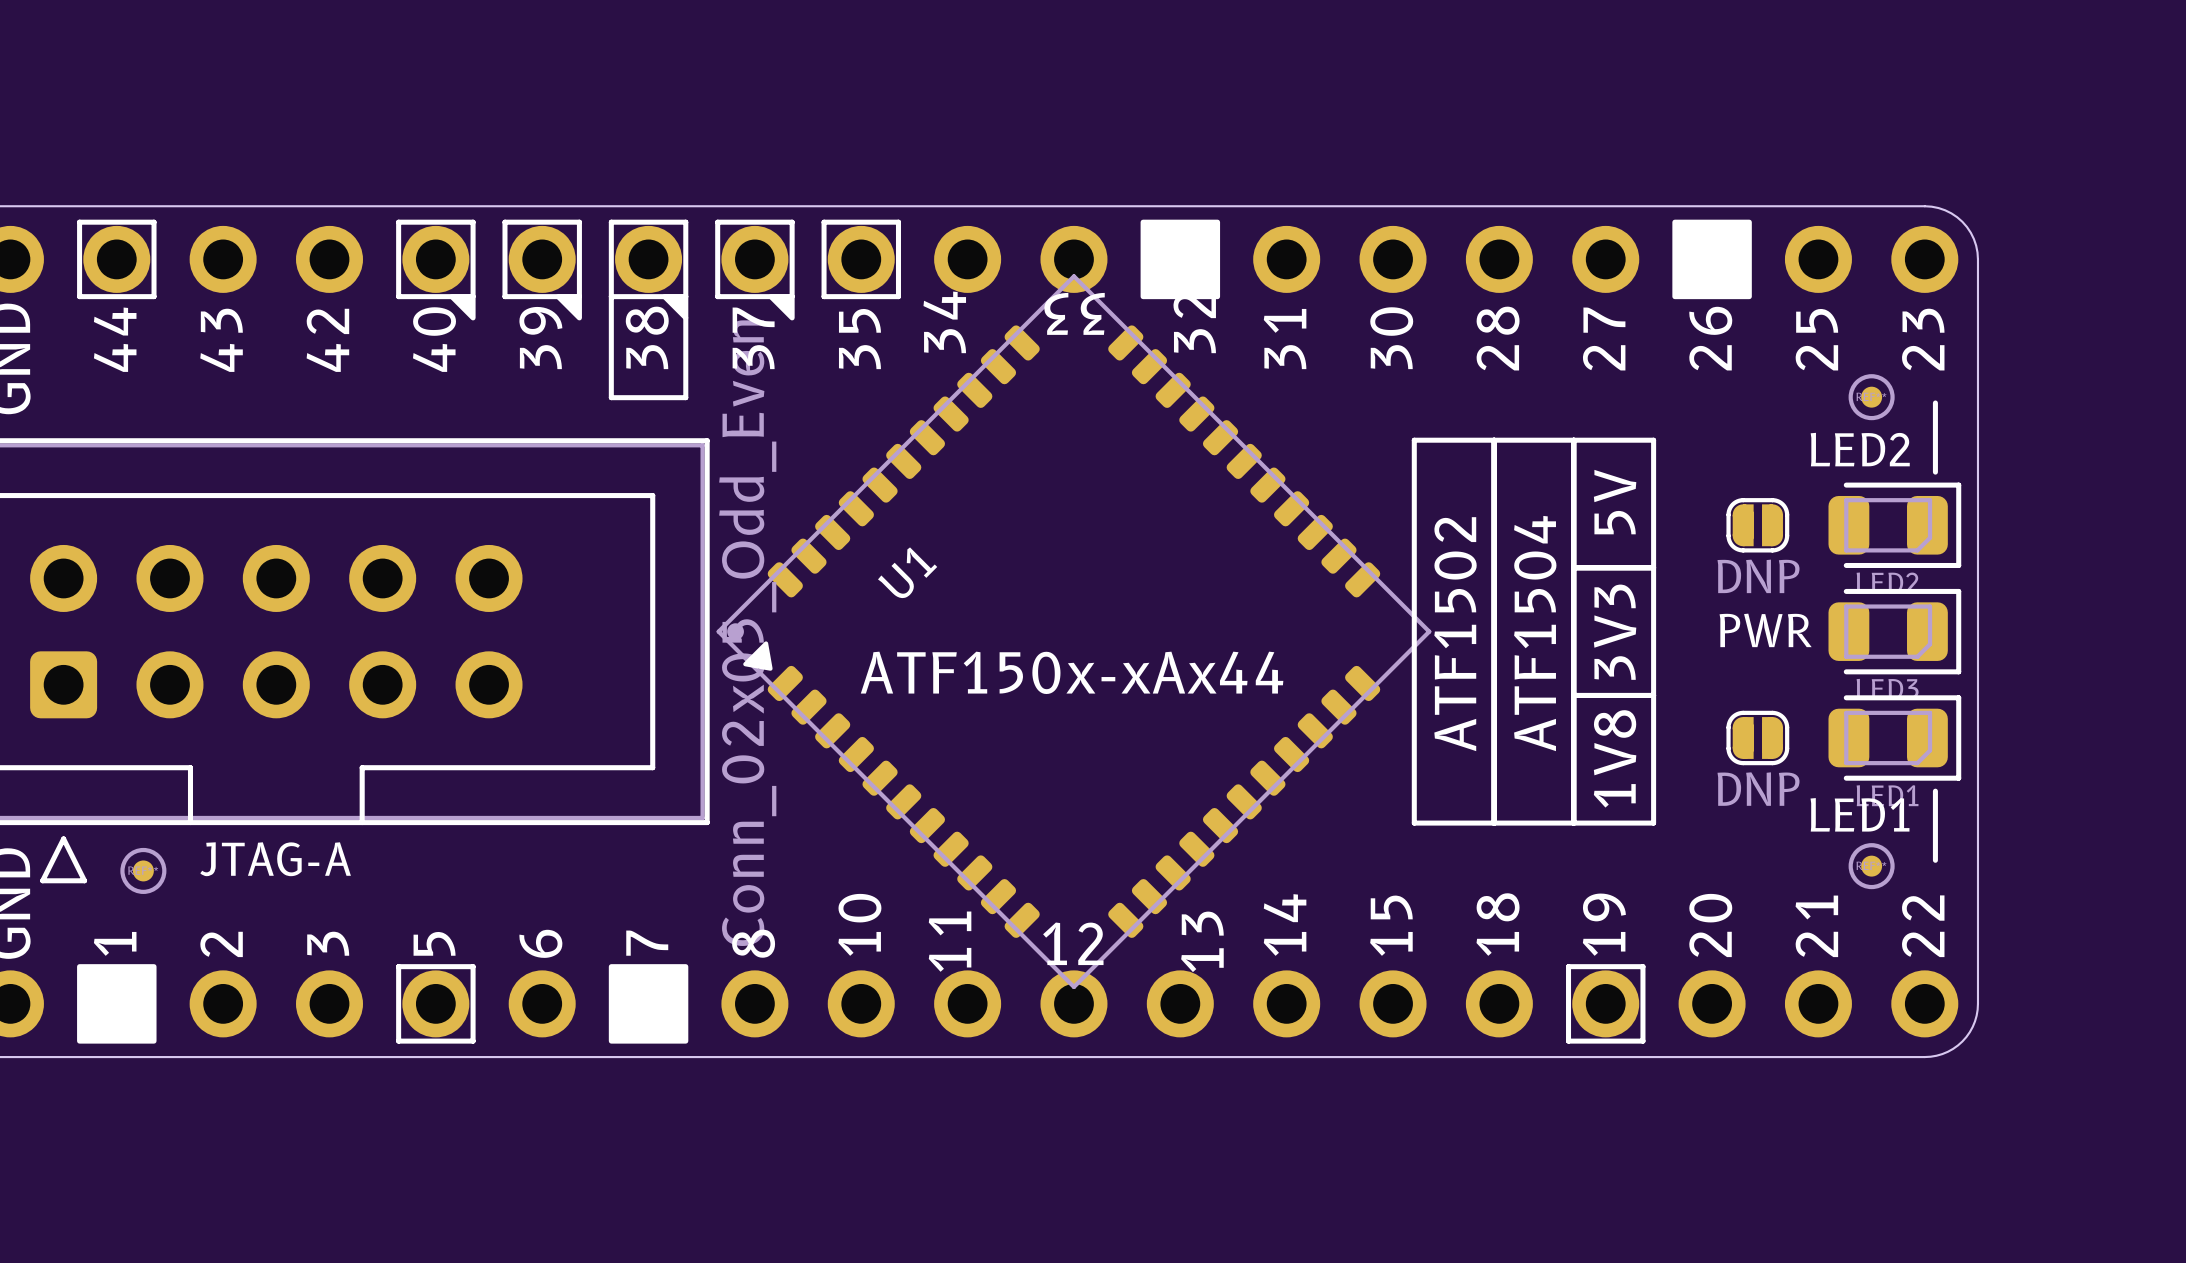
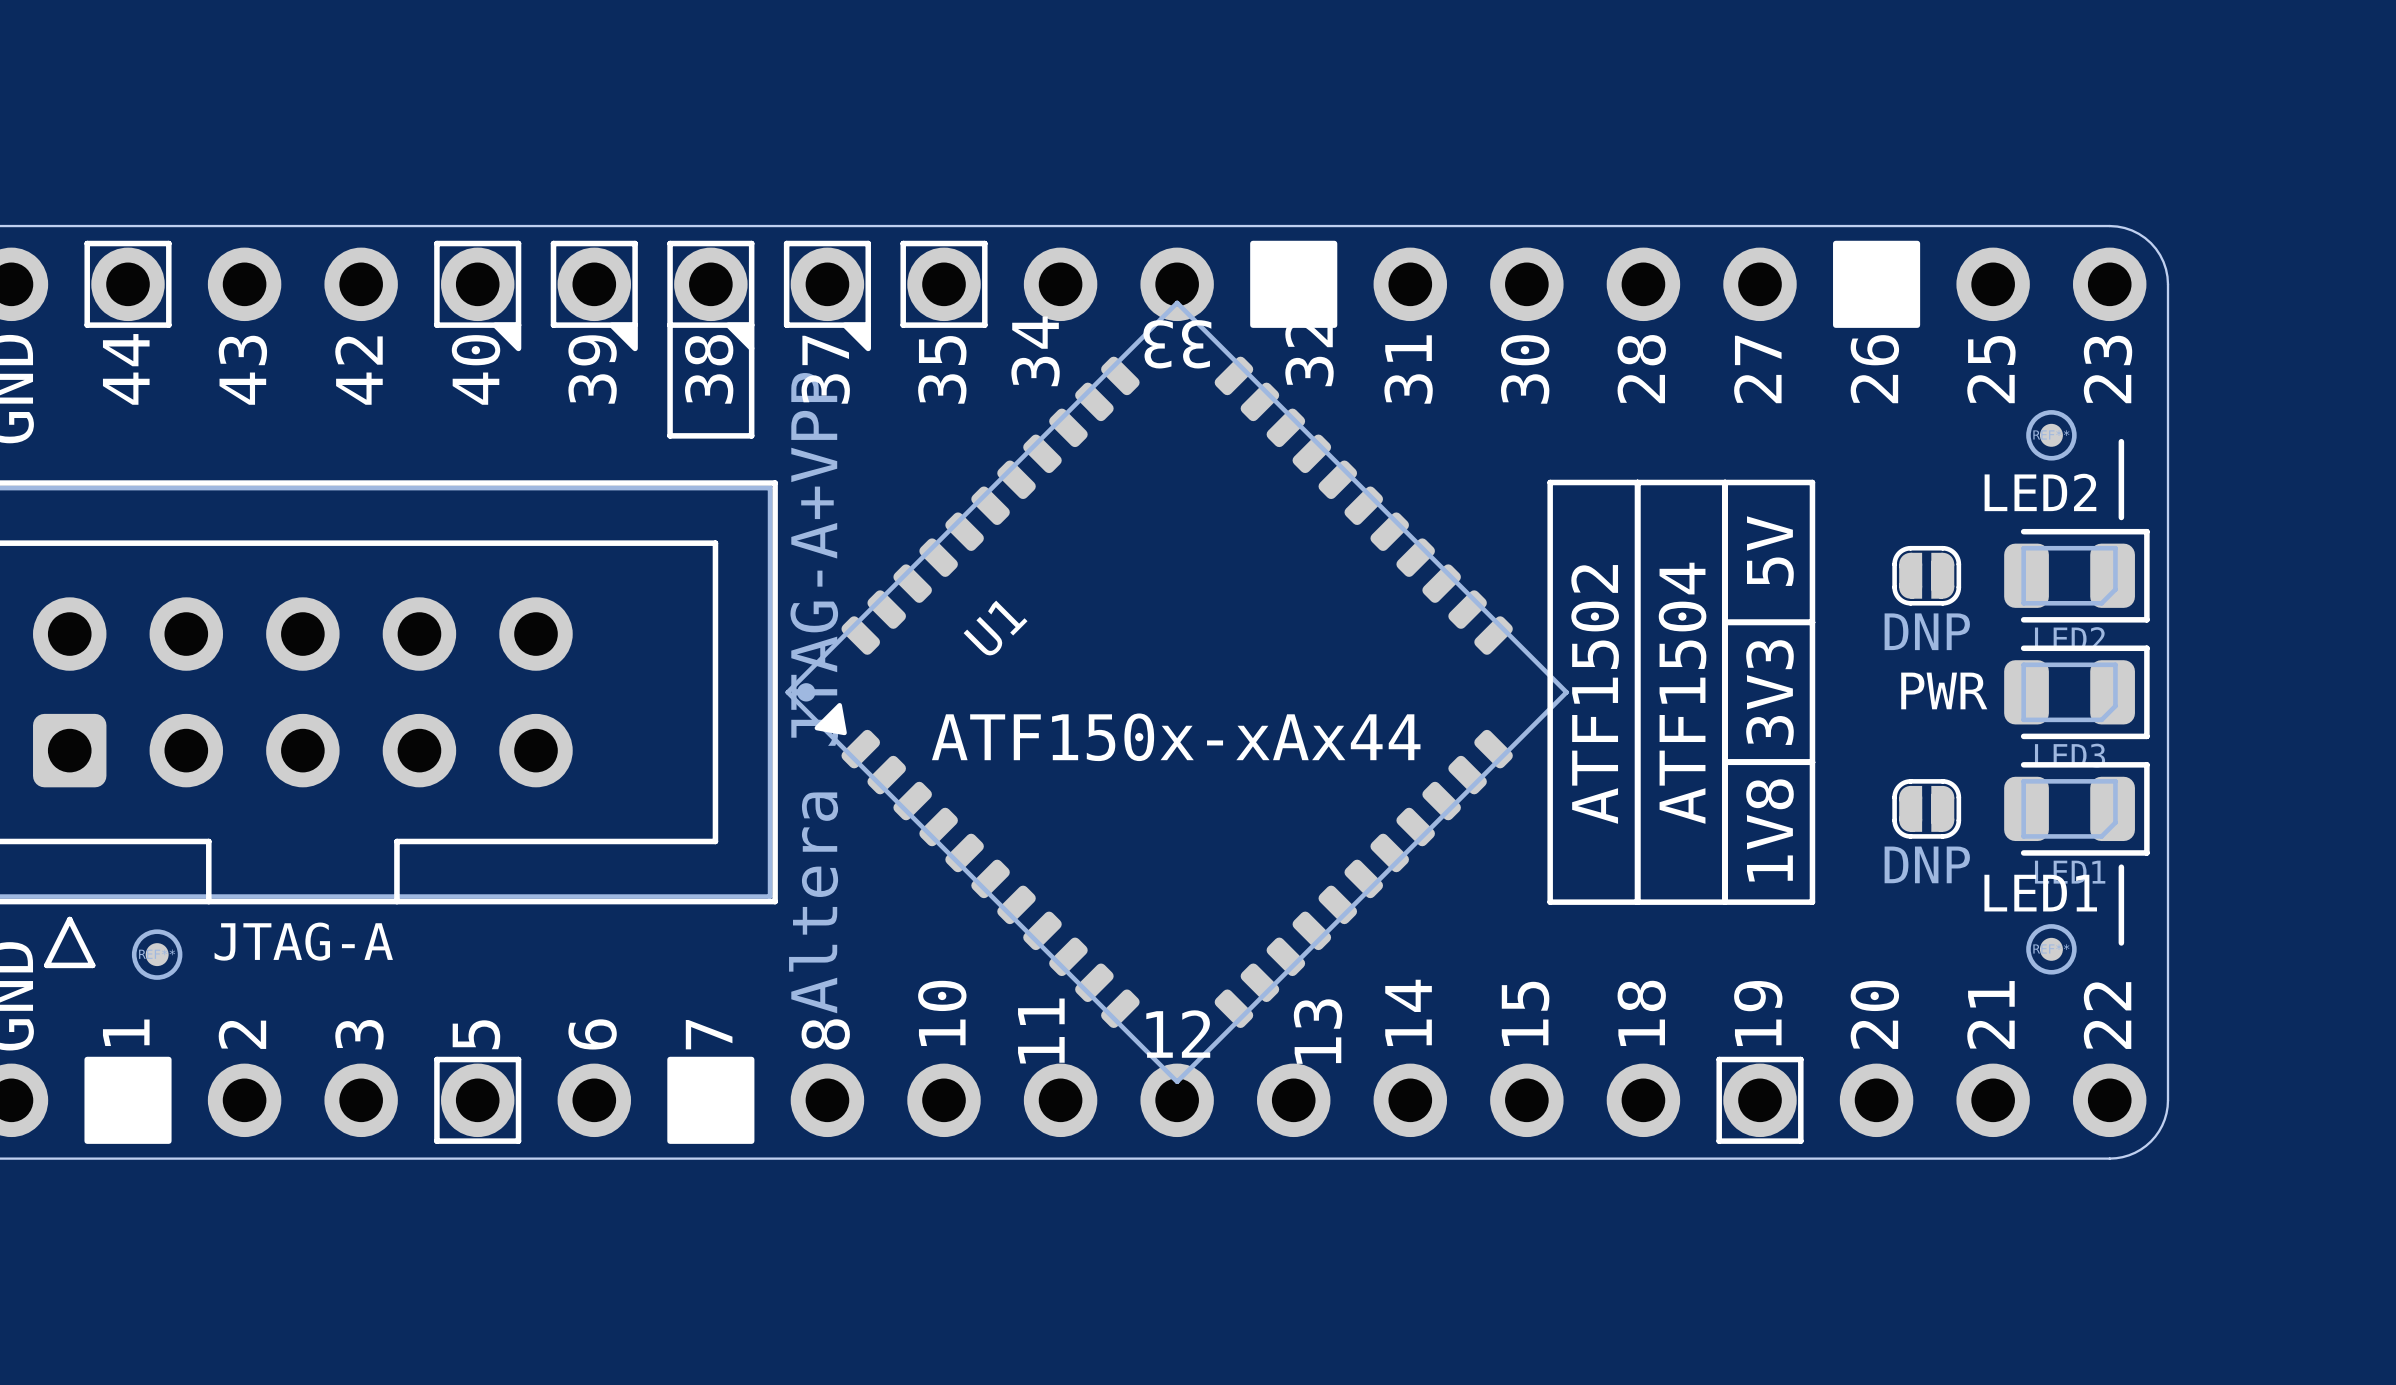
part value: Conn_02x05_Odd_Even (747, 633) -> Altera JTAG-A+VPP (813, 693)

